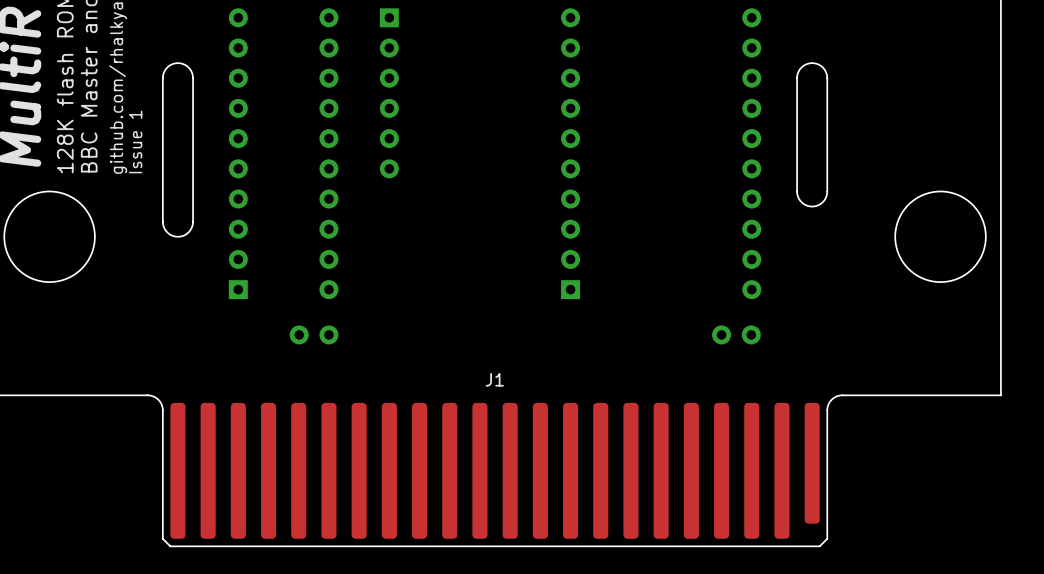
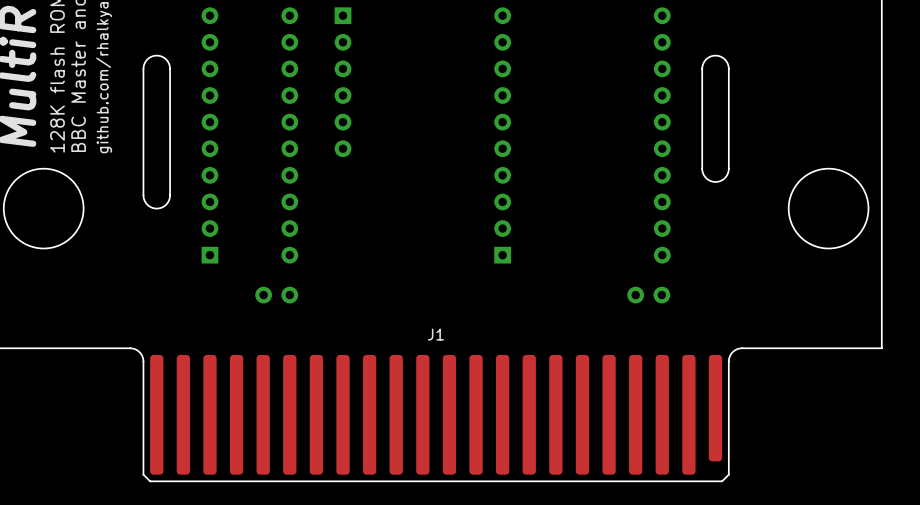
text: Issue 1 (135, 141) -> none

